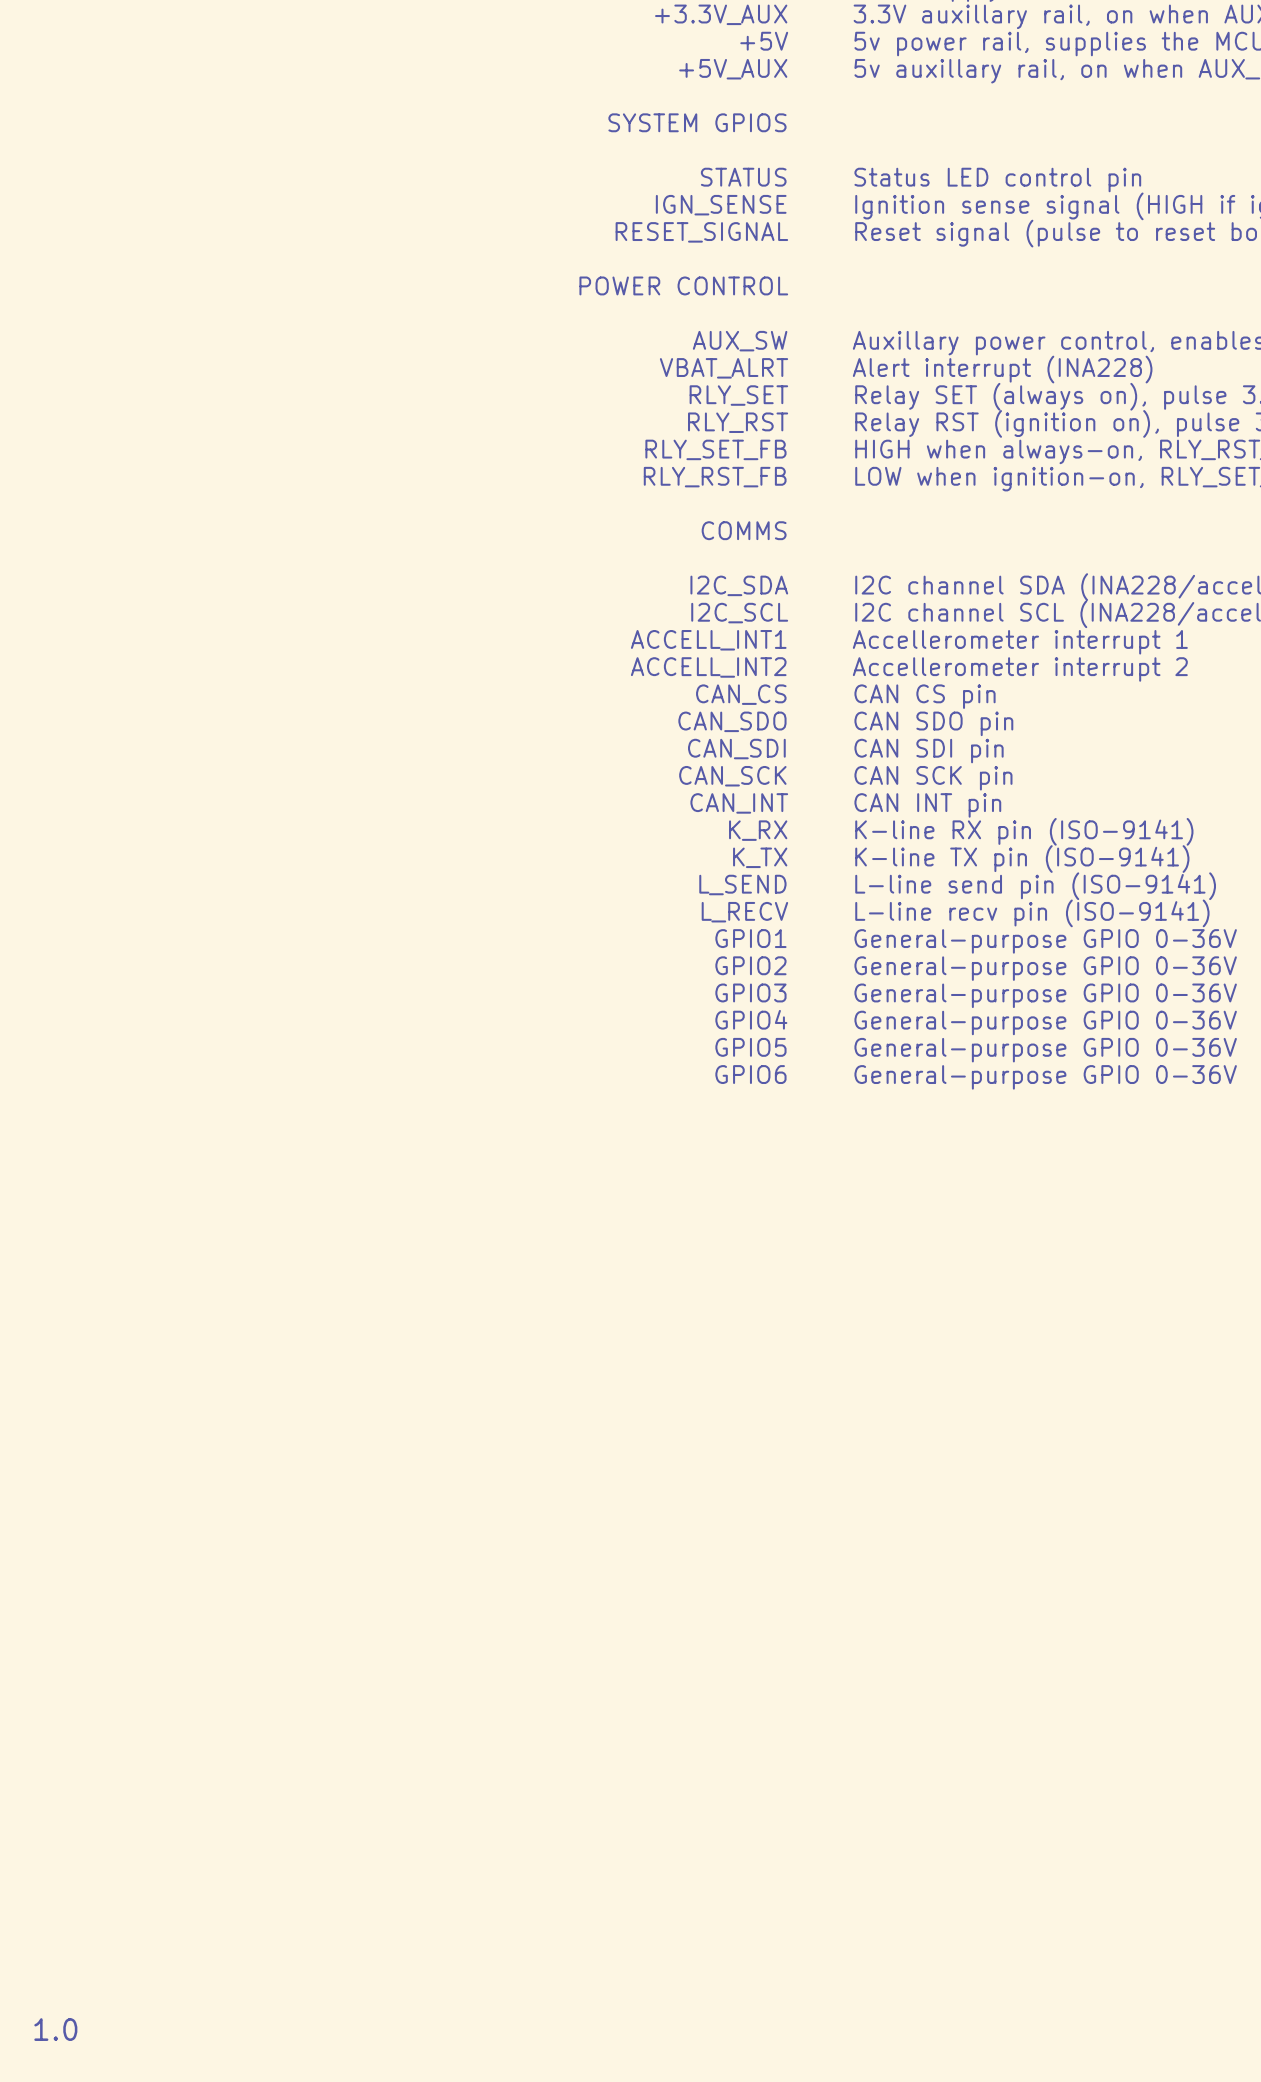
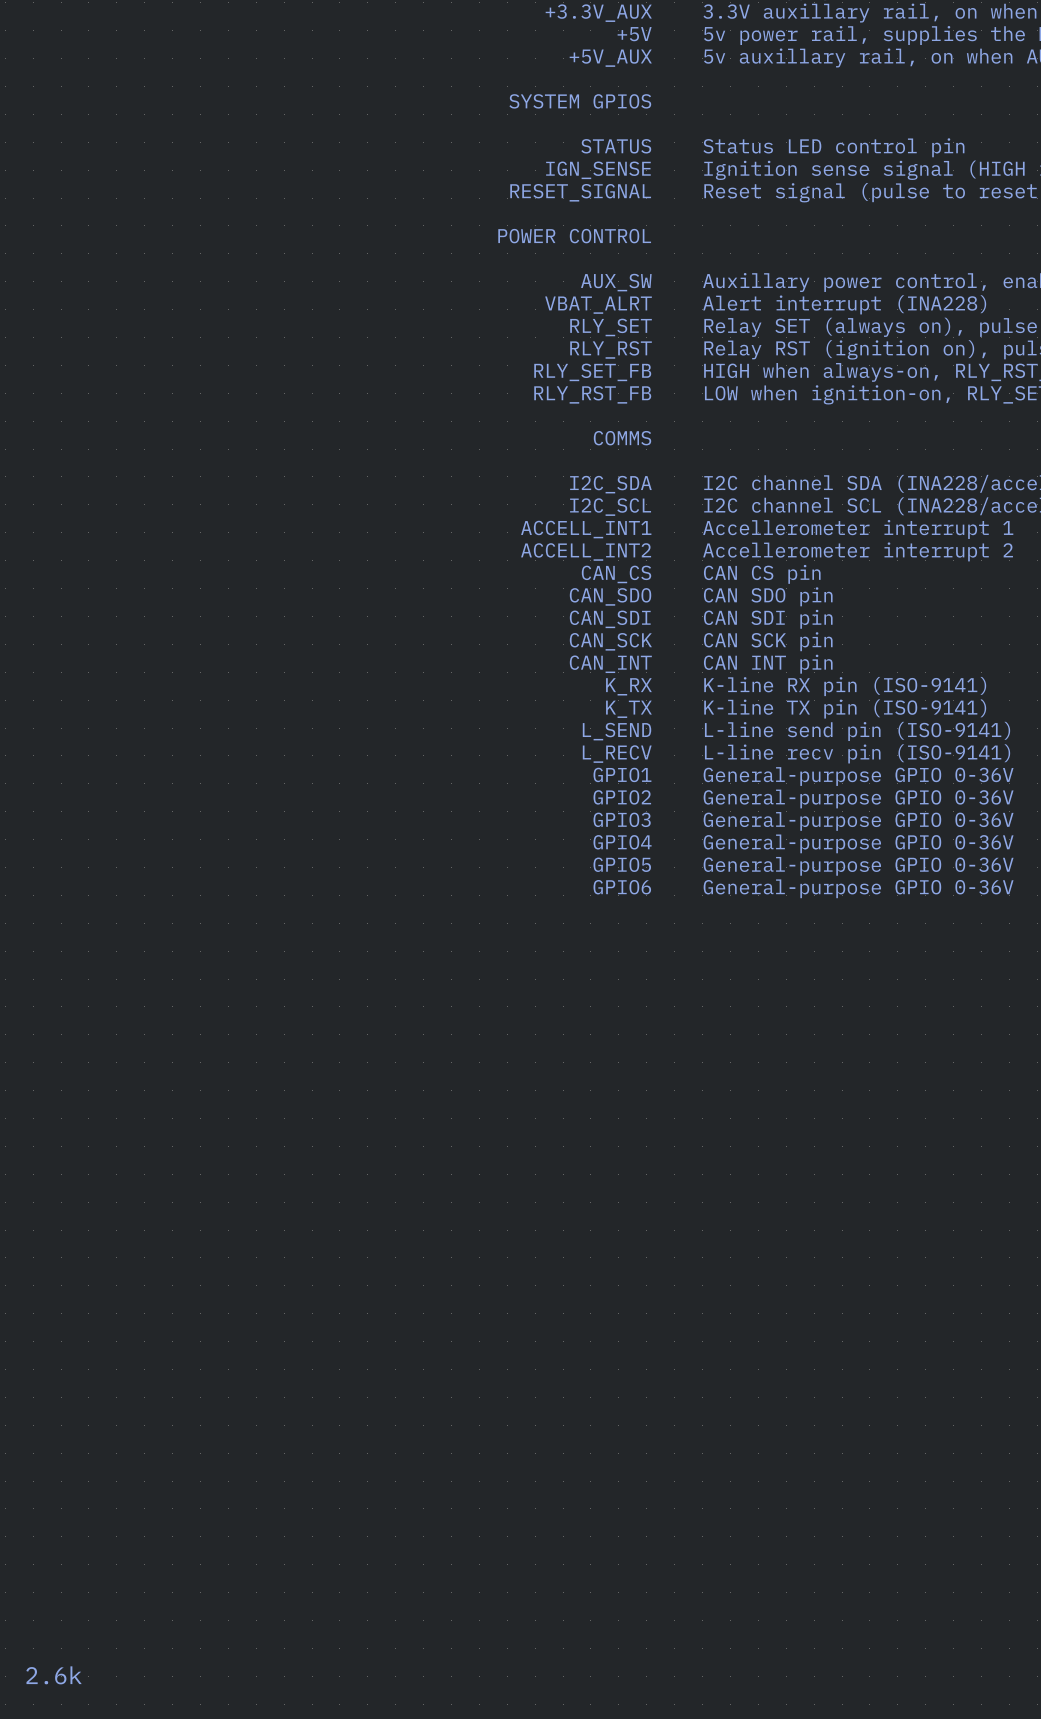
text: 1.0 (55, 2029) -> 2.6k (54, 1675)

